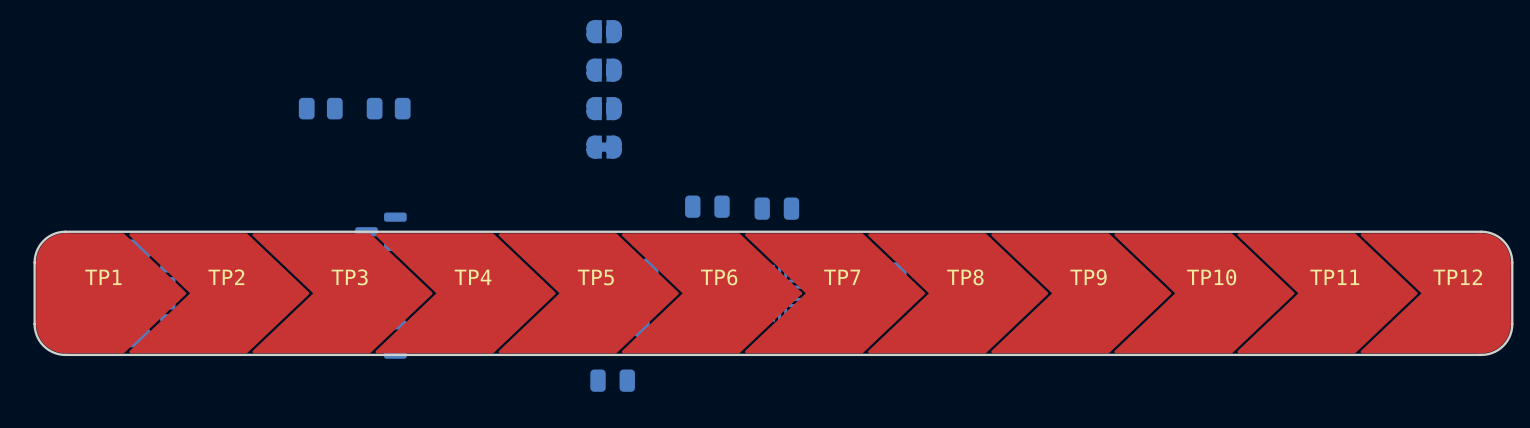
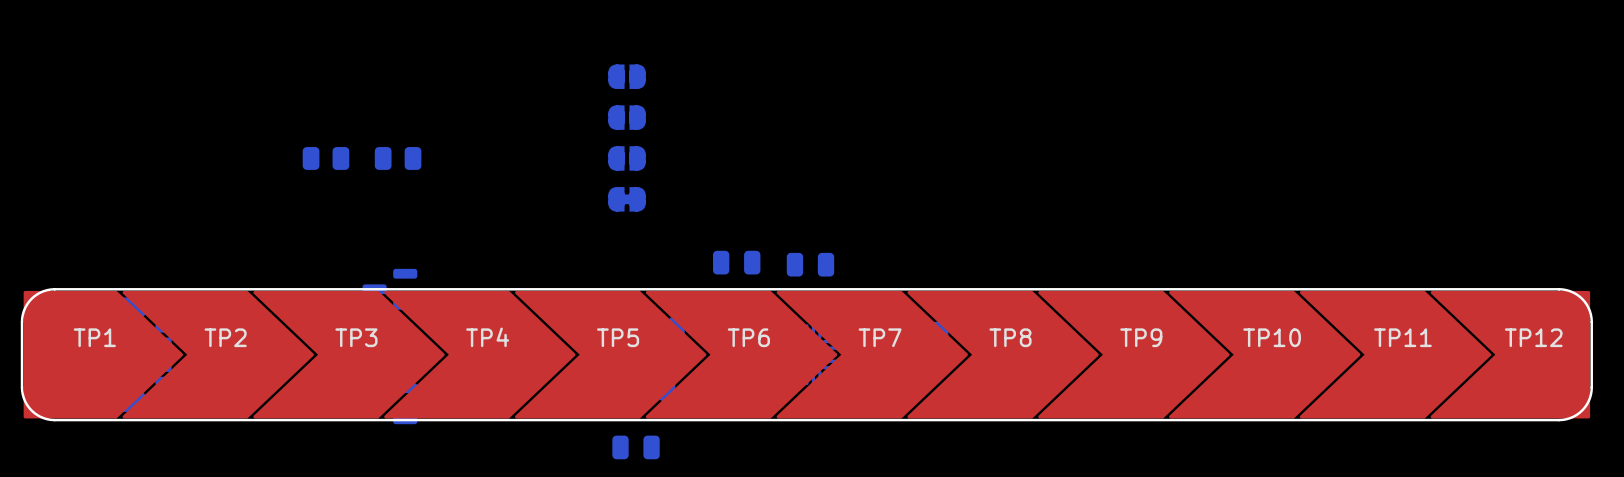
TP1 footprint: [36, 233, 187, 354] -> [23, 290, 184, 419]
TP12 footprint: [1360, 233, 1511, 354] -> [1430, 290, 1591, 419]

